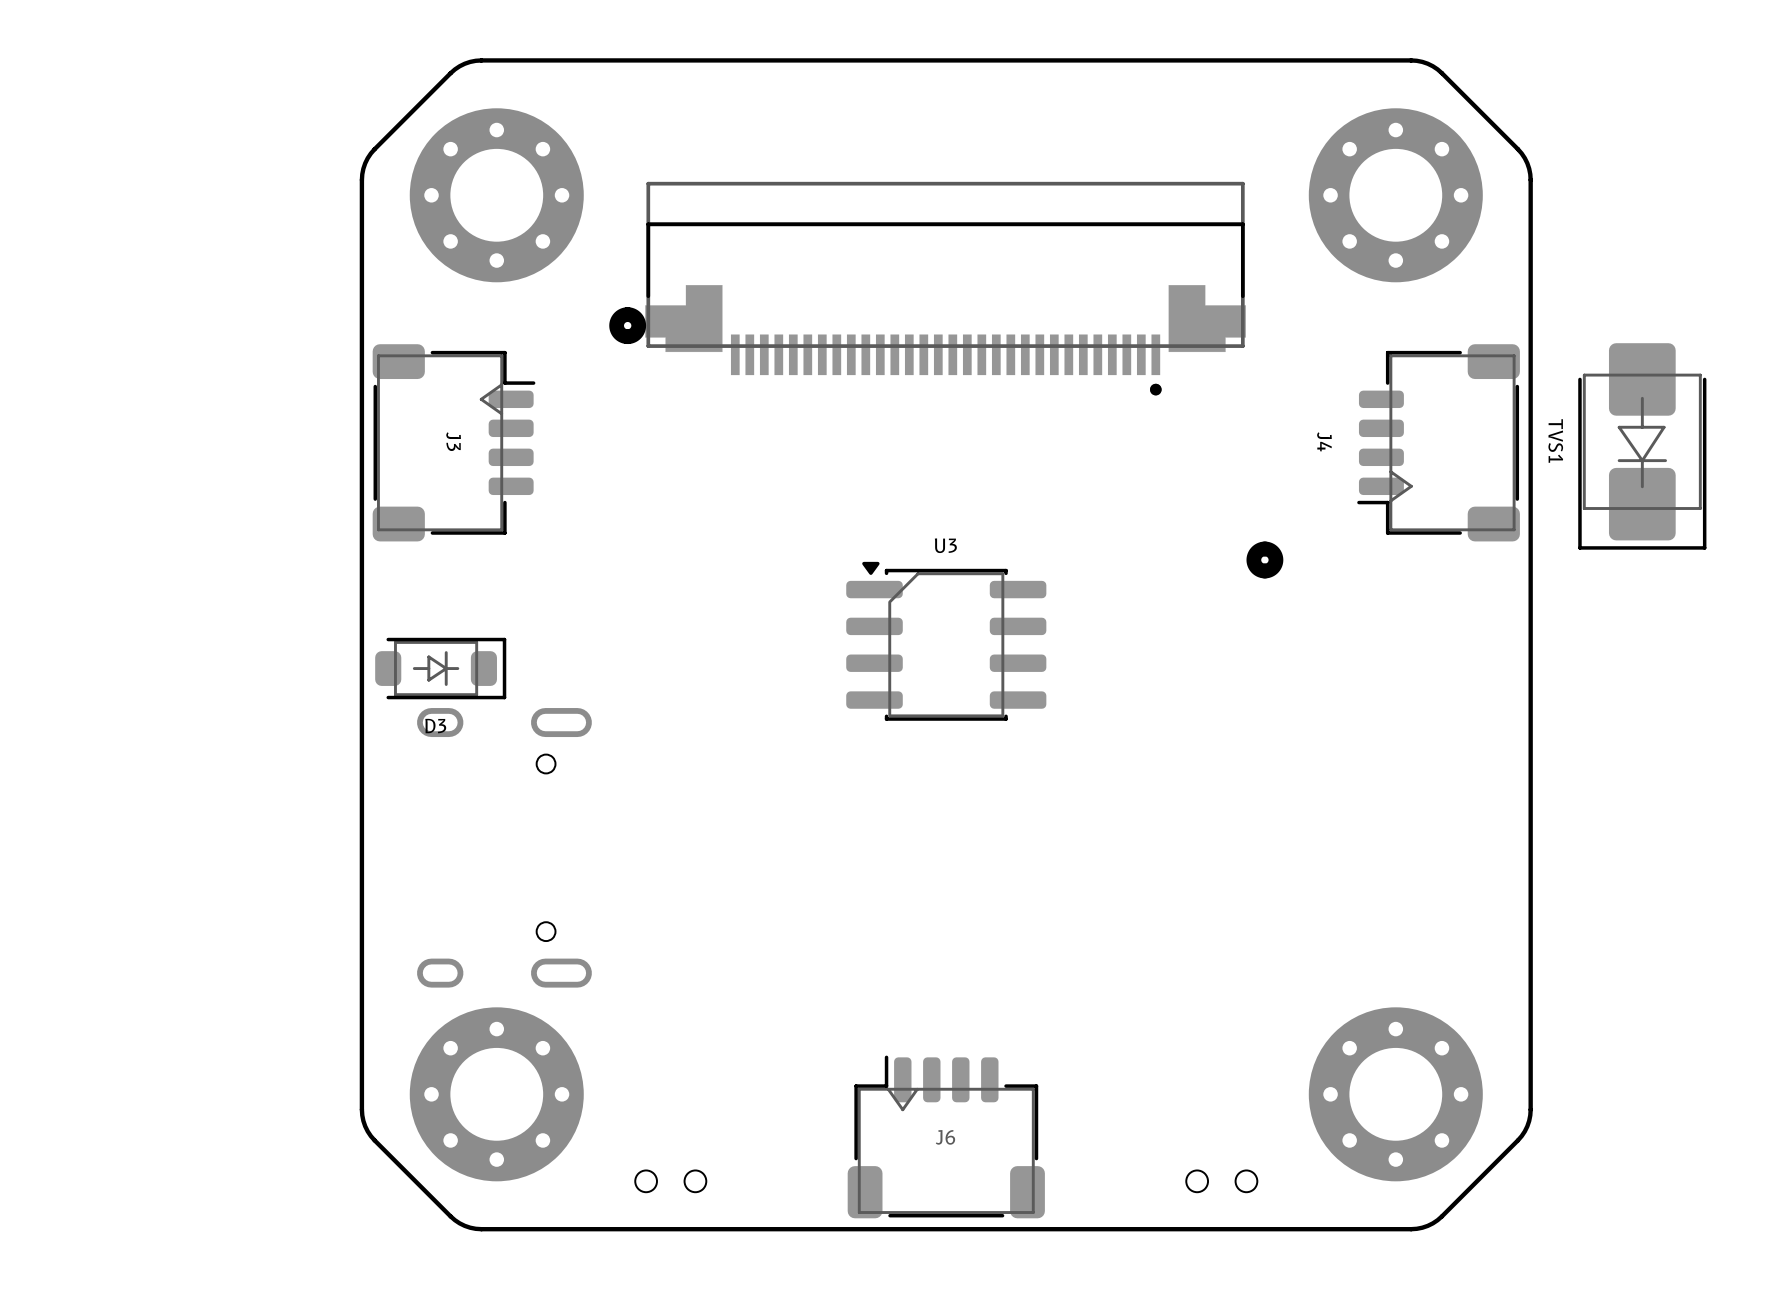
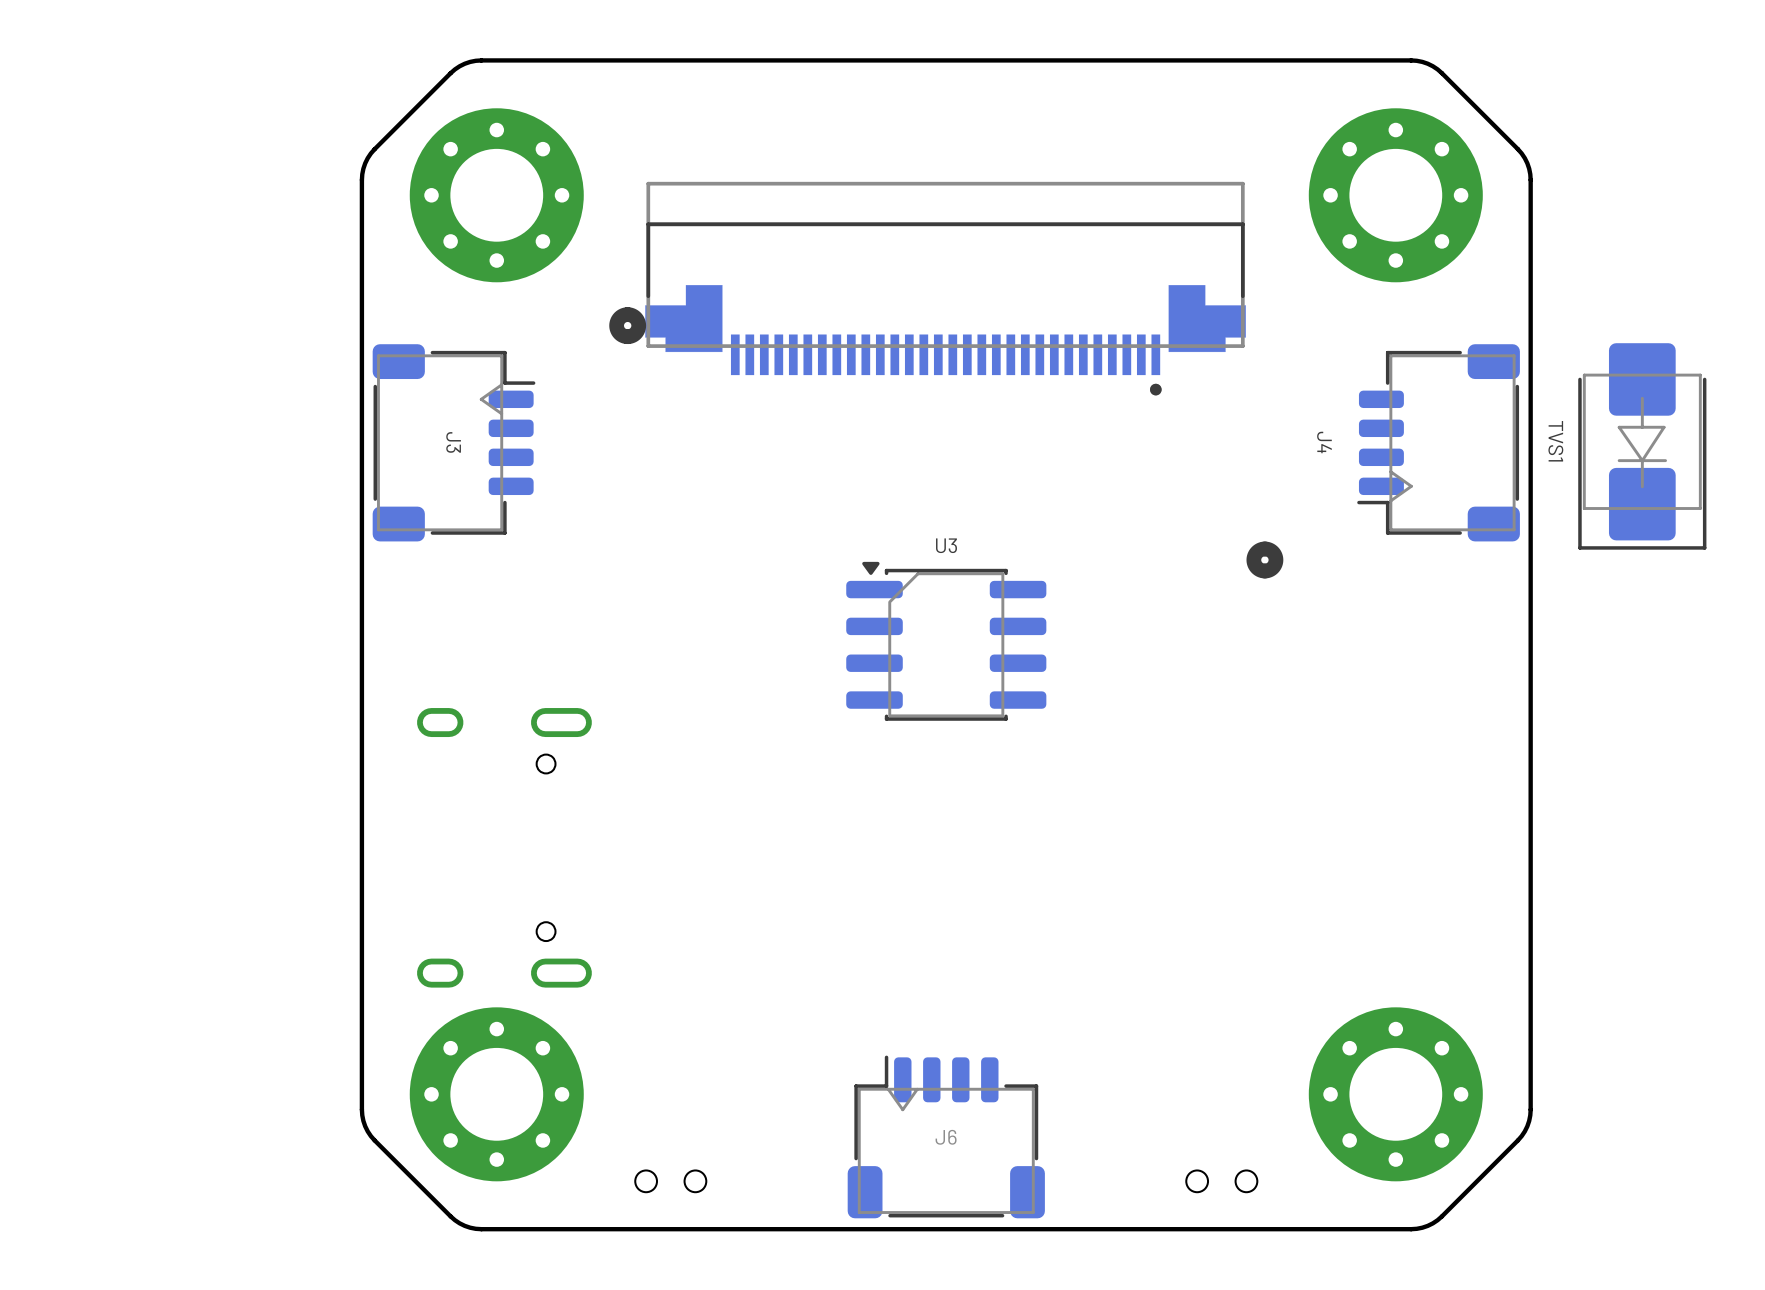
D3: (440, 668) -> none

